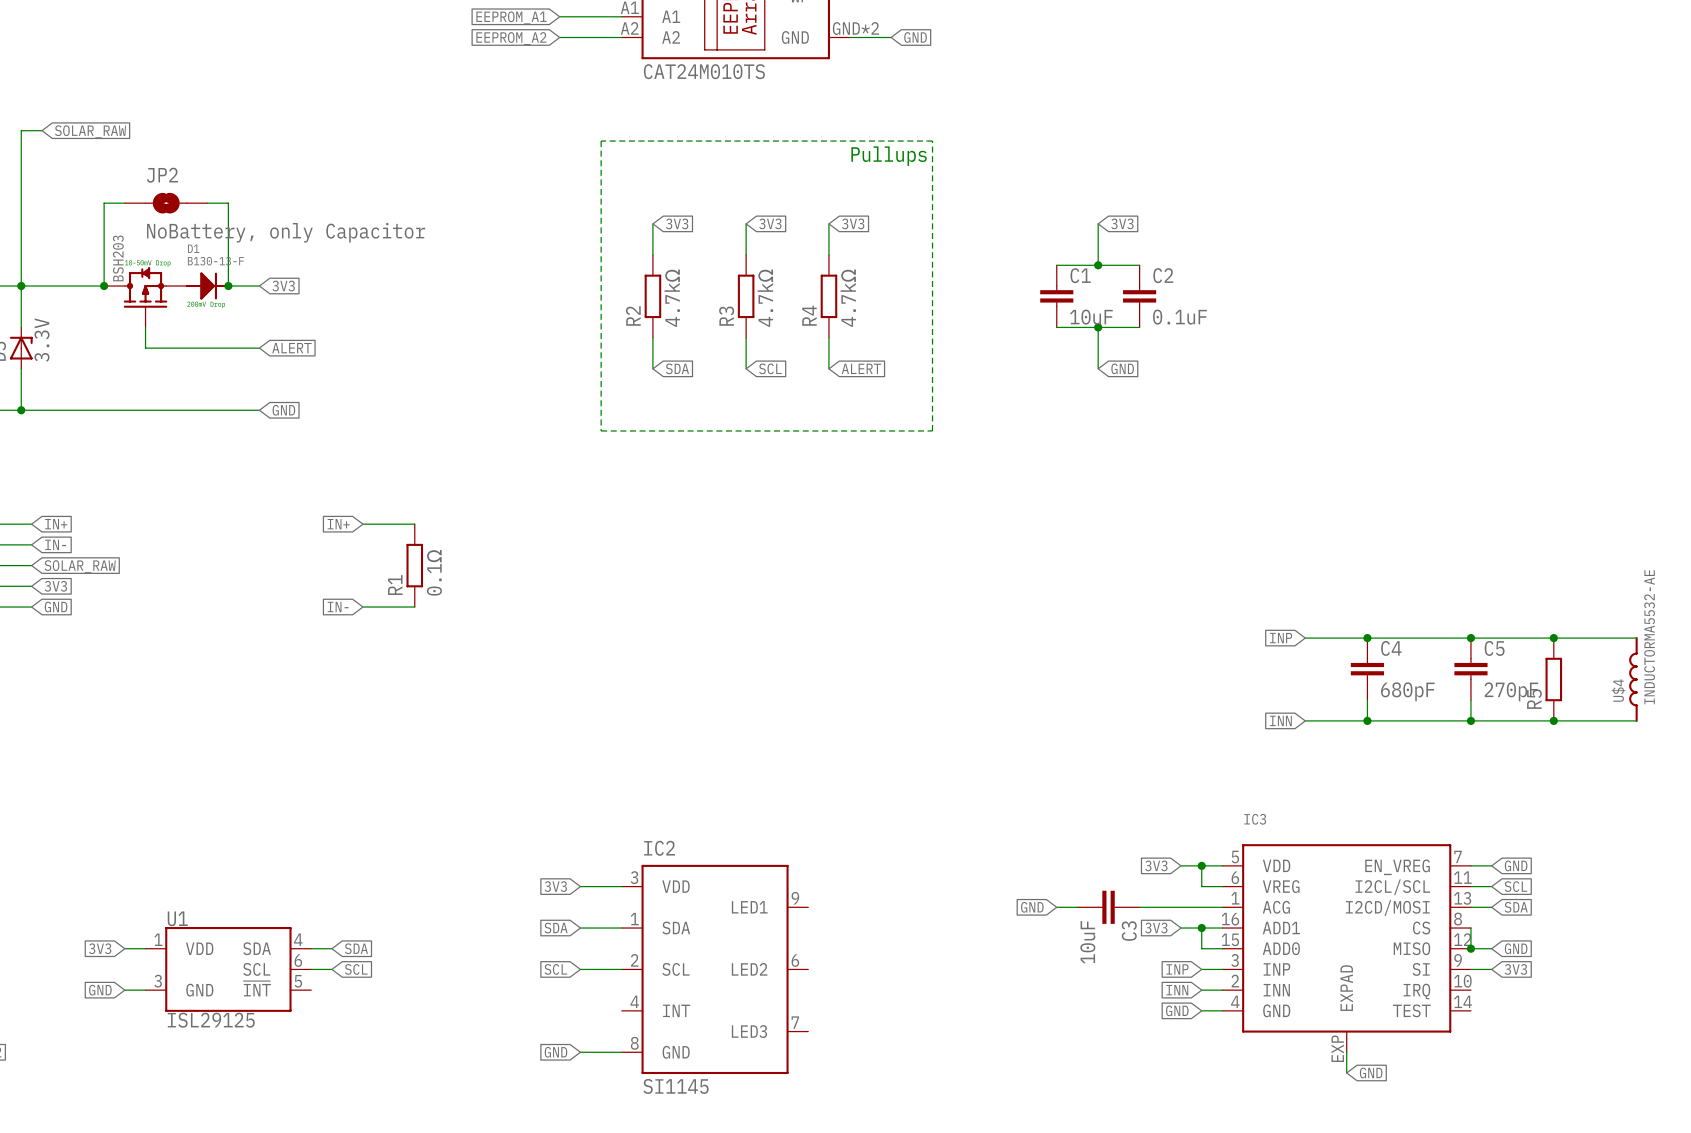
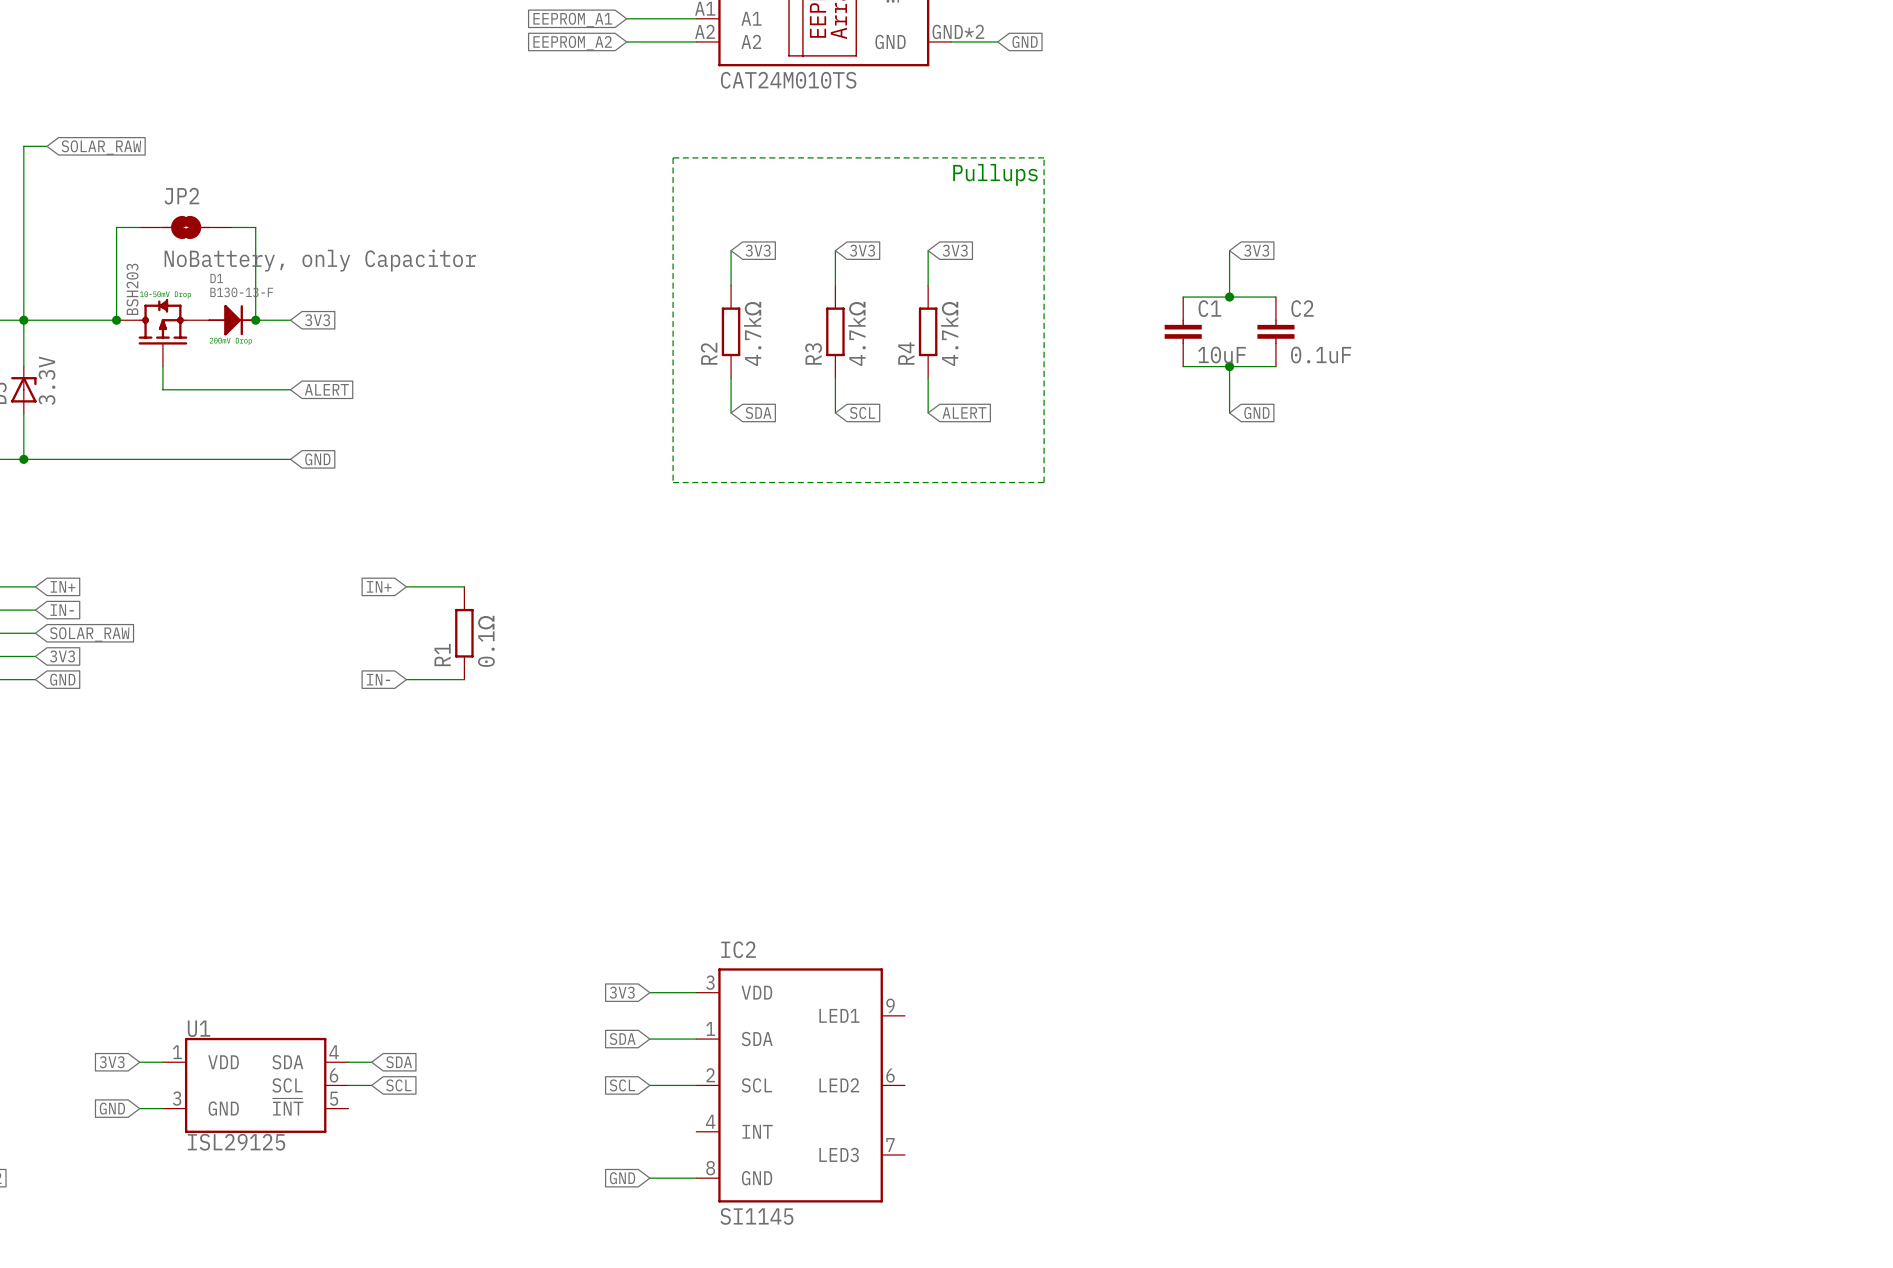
global label: INP (1281, 638) -> none
wire: (1305, 638) (1636, 638) -> none
junction: (1367, 638) -> none
junction: (1470, 638) -> none
junction: (1553, 638) -> none
C4: 680pF (1367, 669) -> none
C5: 270pF (1470, 669) -> none
R5: (1553, 679) -> none
U$4: INDUCTORMA5532-AE (1633, 679) -> none
wire: (1367, 700) (1367, 720) -> none
wire: (1470, 700) (1470, 720) -> none
global label: INN (1280, 720) -> none
wire: (1305, 720) (1636, 720) -> none
junction: (1367, 720) -> none
junction: (1470, 720) -> none
junction: (1553, 720) -> none
global label: 3V3 (1156, 865) -> none
wire: (1181, 865) (1222, 865) -> none
wire: (1201, 865) (1201, 886) (1222, 886) -> none
junction: (1201, 865) -> none
wire: (1470, 865) (1491, 865) -> none
global label: GND (1516, 865) -> none
wire: (1470, 886) (1491, 886) -> none
global label: SCL (1515, 886) -> none
global label: GND (1032, 907) -> none
wire: (1056, 907) (1077, 907) -> none
C3: 10uF (1108, 907) -> none
wire: (1139, 907) (1222, 907) -> none
wire: (1470, 907) (1491, 907) -> none
global label: SDA (1516, 907) -> none
global label: 3V3 (1156, 928) -> none
wire: (1181, 928) (1222, 928) -> none
wire: (1201, 928) (1201, 948) (1222, 948) -> none
junction: (1201, 928) -> none
wire: (1470, 928) (1470, 948) (1491, 948) -> none
IC3: (1346, 948) -> none
junction: (1470, 948) -> none
global label: GND (1516, 948) -> none
global label: INP (1177, 969) -> none
wire: (1201, 969) (1222, 969) -> none
wire: (1470, 969) (1491, 969) -> none
global label: 3V3 (1515, 969) -> none
global label: INN (1177, 990) -> none
wire: (1201, 990) (1222, 990) -> none
global label: GND (1177, 1010) -> none
wire: (1201, 1010) (1222, 1010) -> none
wire: (1346, 1052) (1346, 1072) -> none
global label: GND (1371, 1072) -> none

